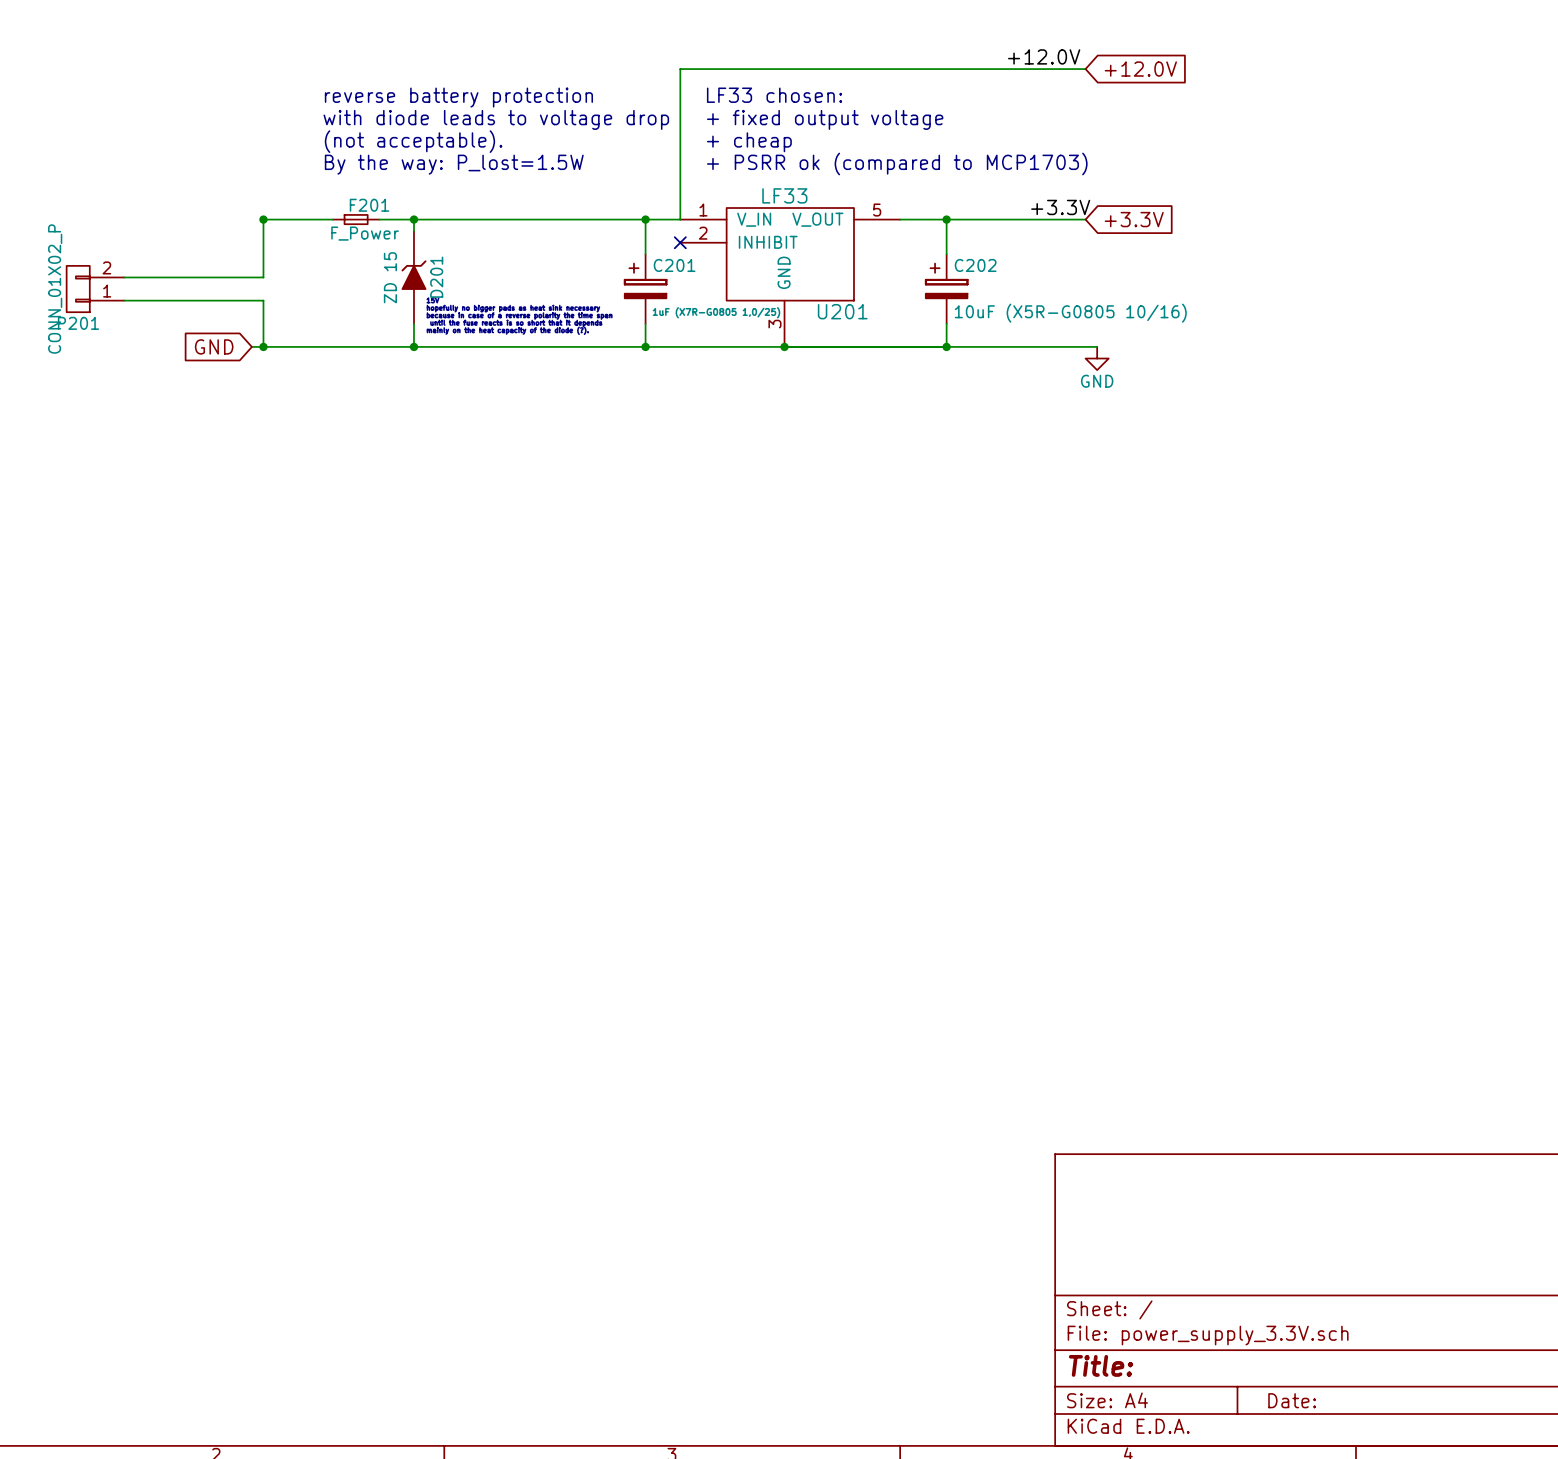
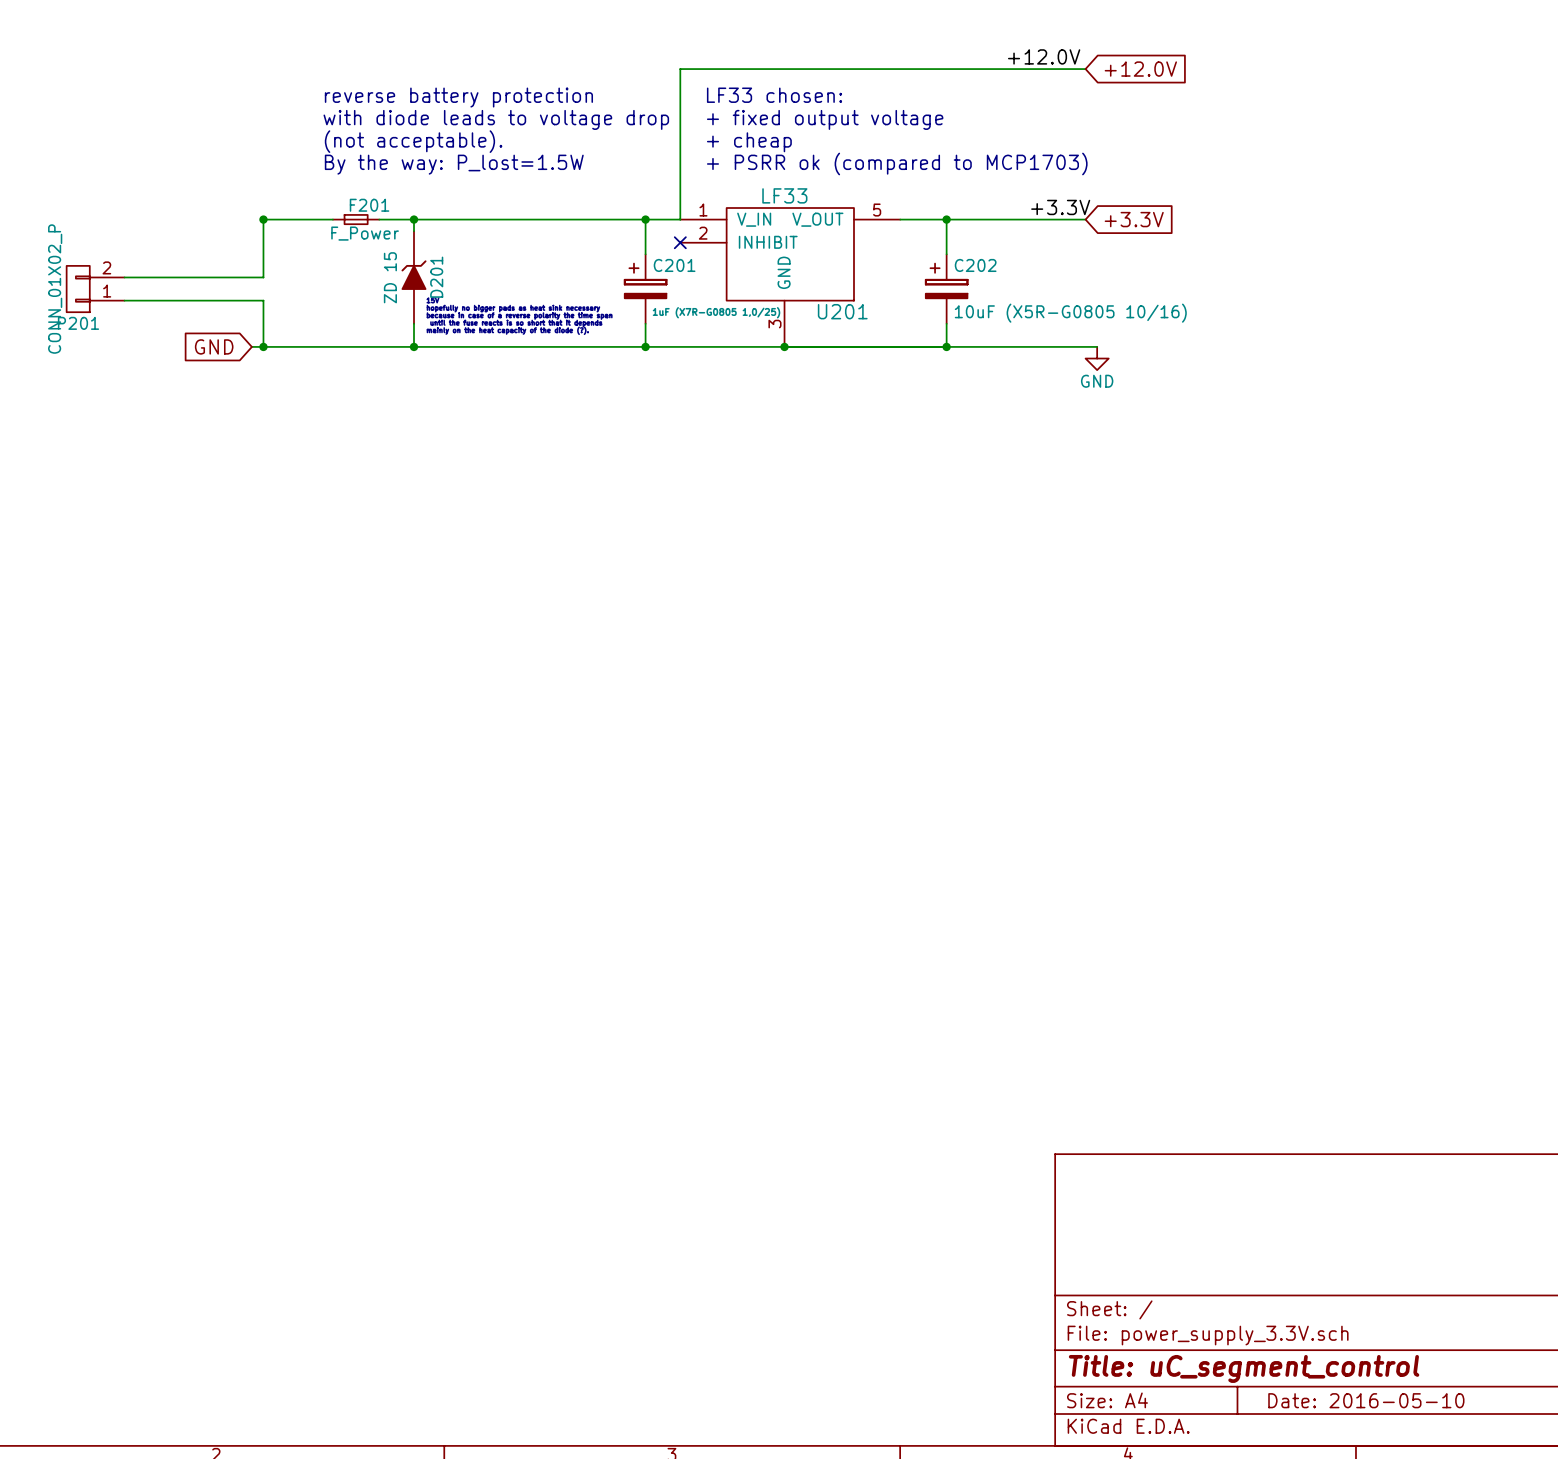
title block: Title: (1101, 1365) -> Title: uC_segment_control (1244, 1368)
title block: Date: (1292, 1400) -> Date: 2016-05-10 (1366, 1400)

